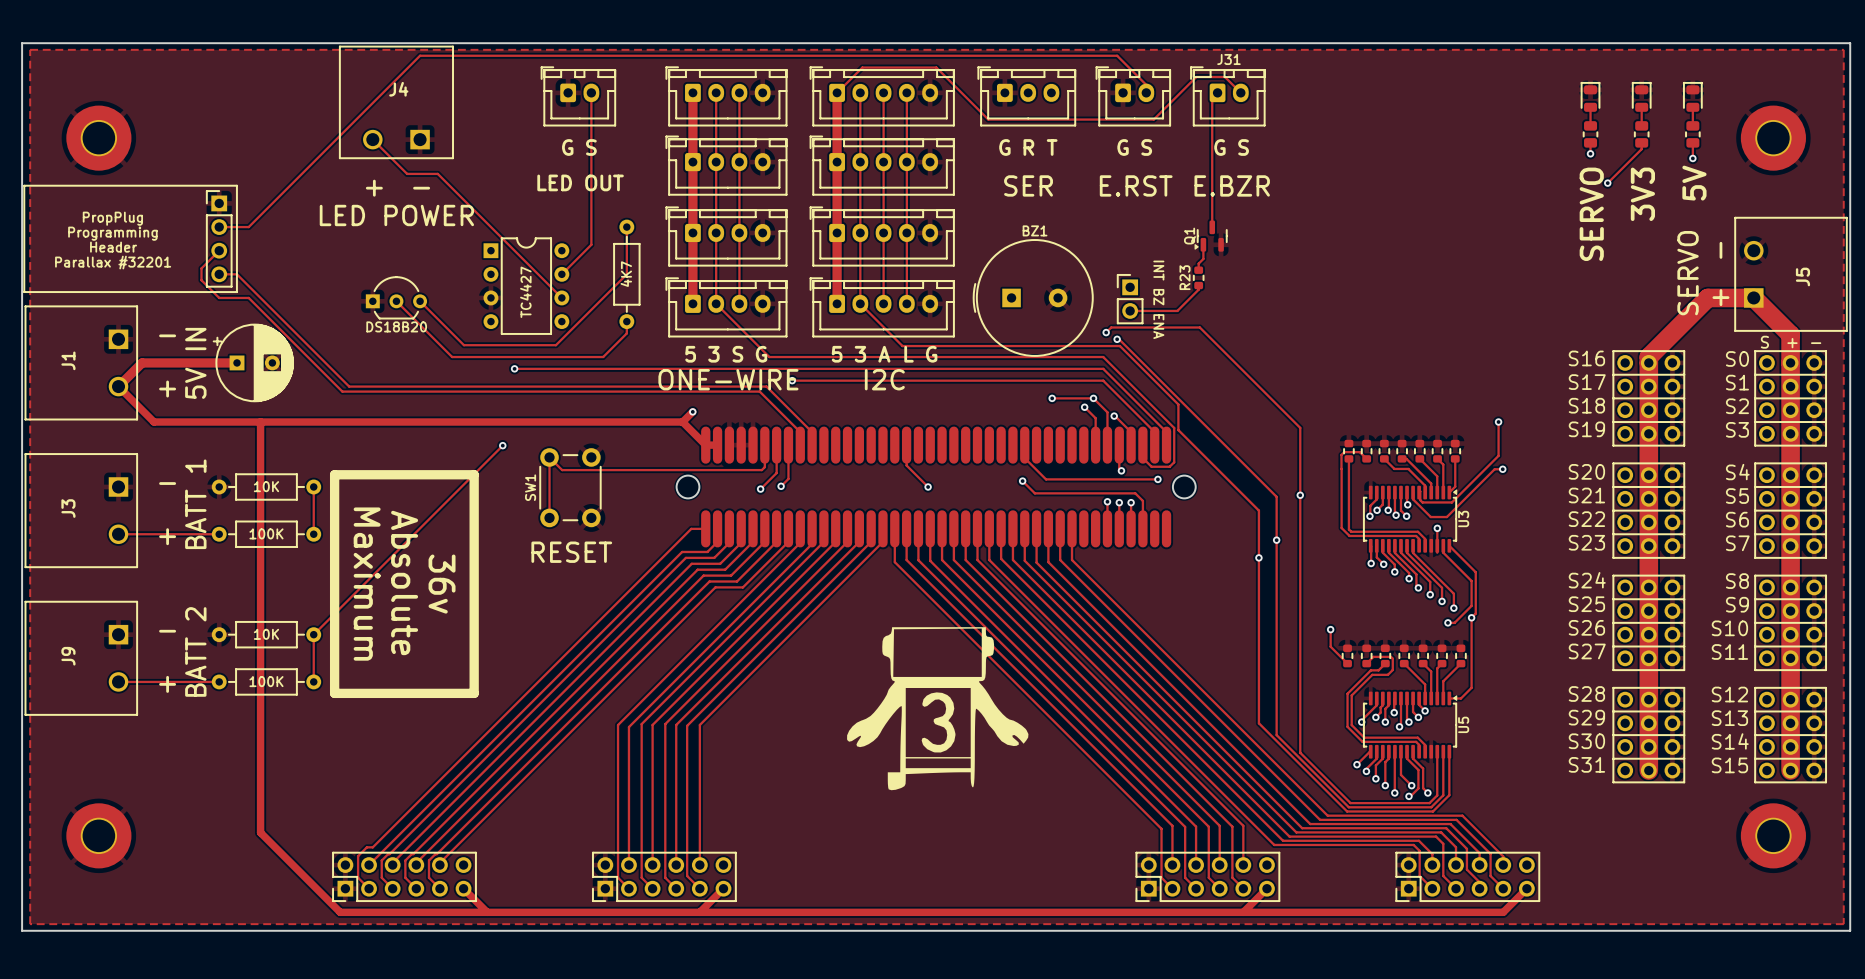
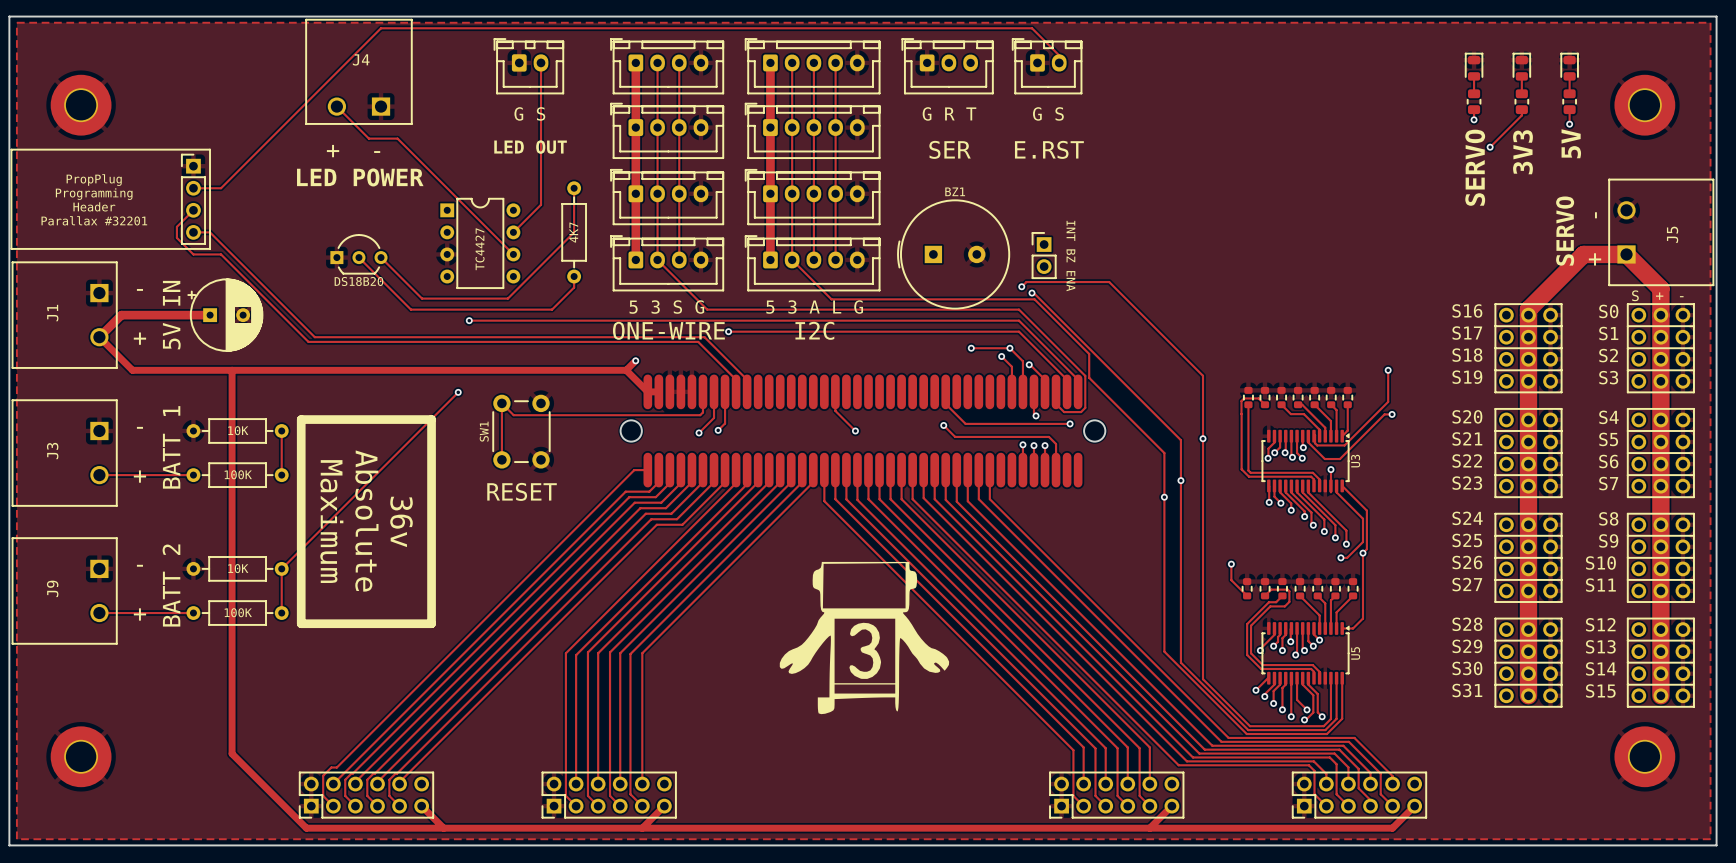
track: (837, 92) (862, 67) (936, 67) (988, 119) (1153, 119) (1196, 77) (1224, 77) (1241, 93) -> none
track: (1217, 92) (1212, 98) (1212, 227) -> none
J31: (1227, 96) -> none
text: G (1219, 147) -> none
text: S (1243, 147) -> none
text: E.BZR (1232, 185) -> none
Q1: (1210, 236) -> none
track: (1203, 244) (1203, 258) (1198, 263) (1198, 270) -> none
R23: (1198, 277) -> none
track: (1198, 285) (1198, 289) (1177, 310) (1130, 310) -> none

